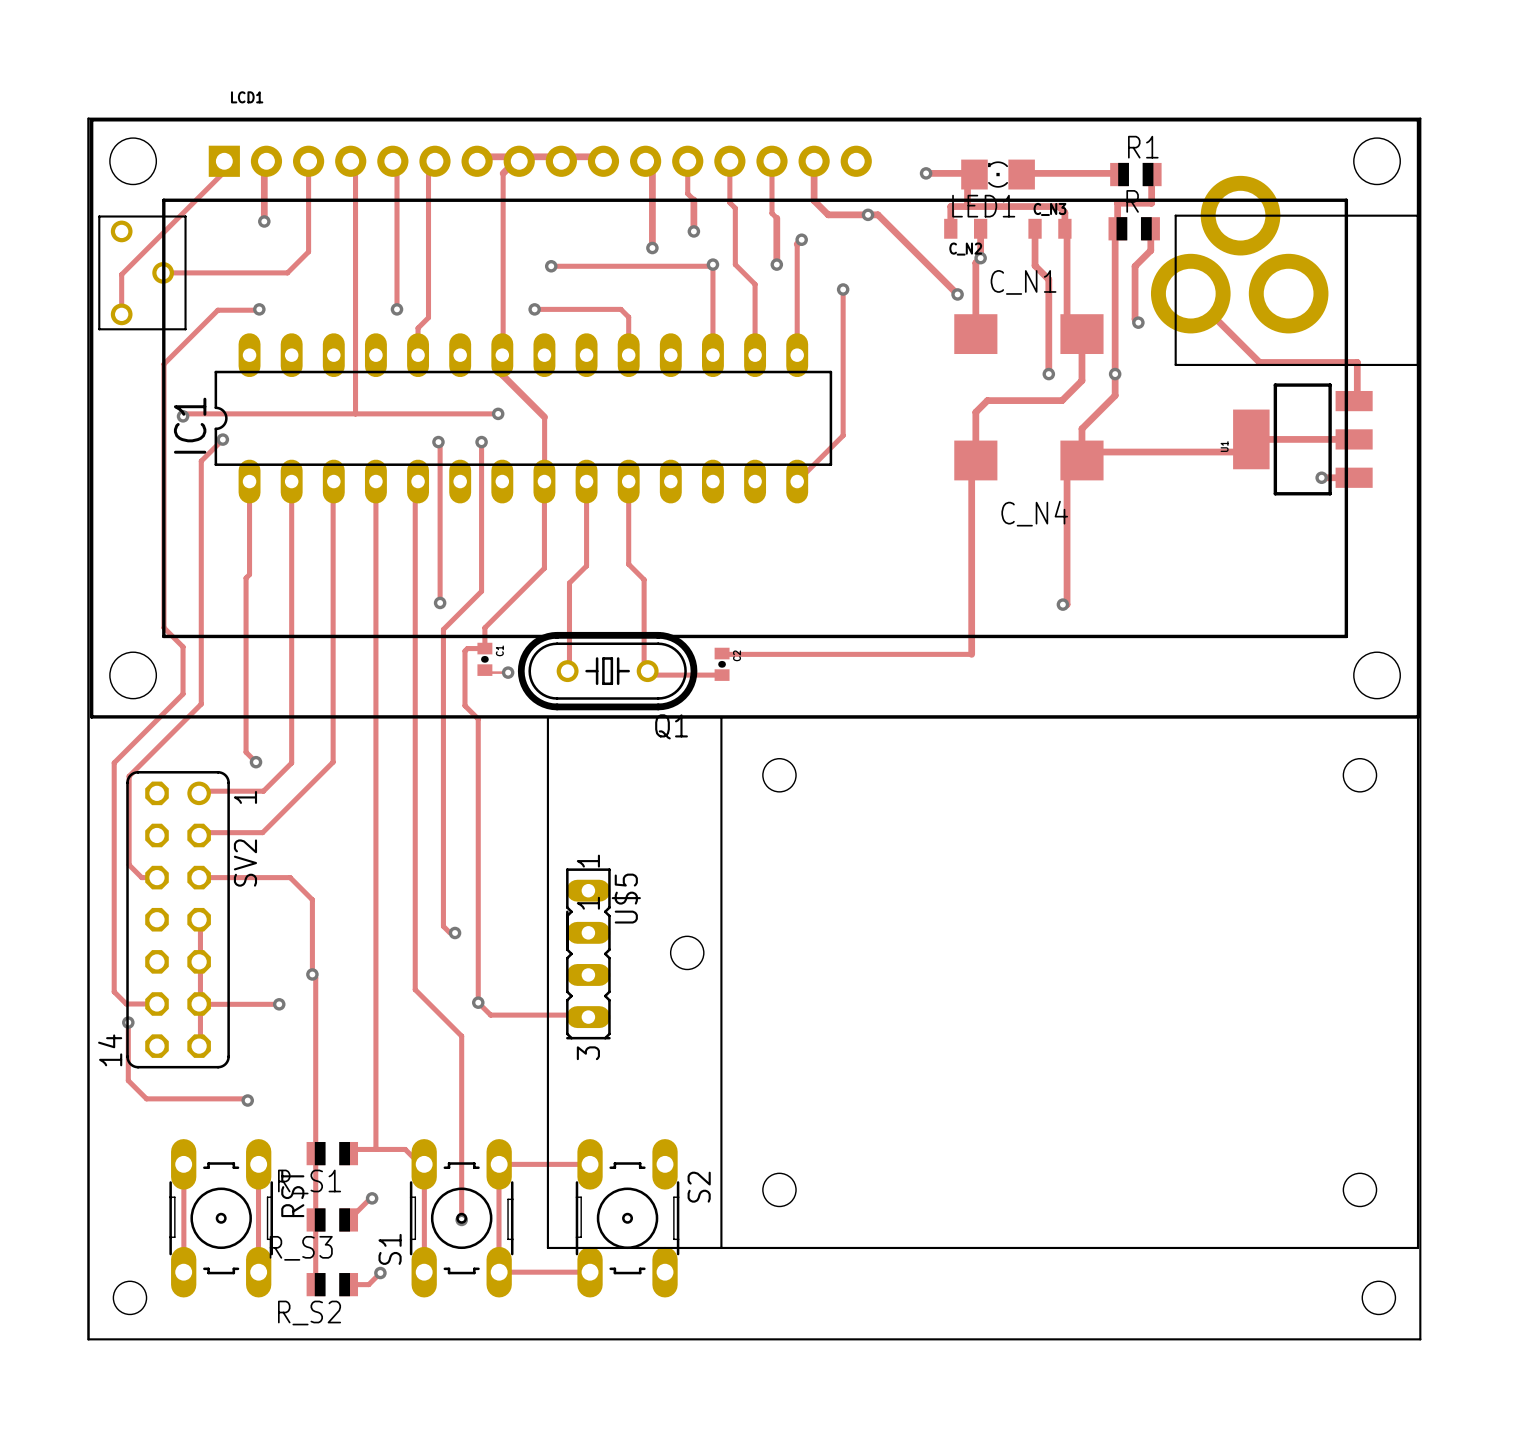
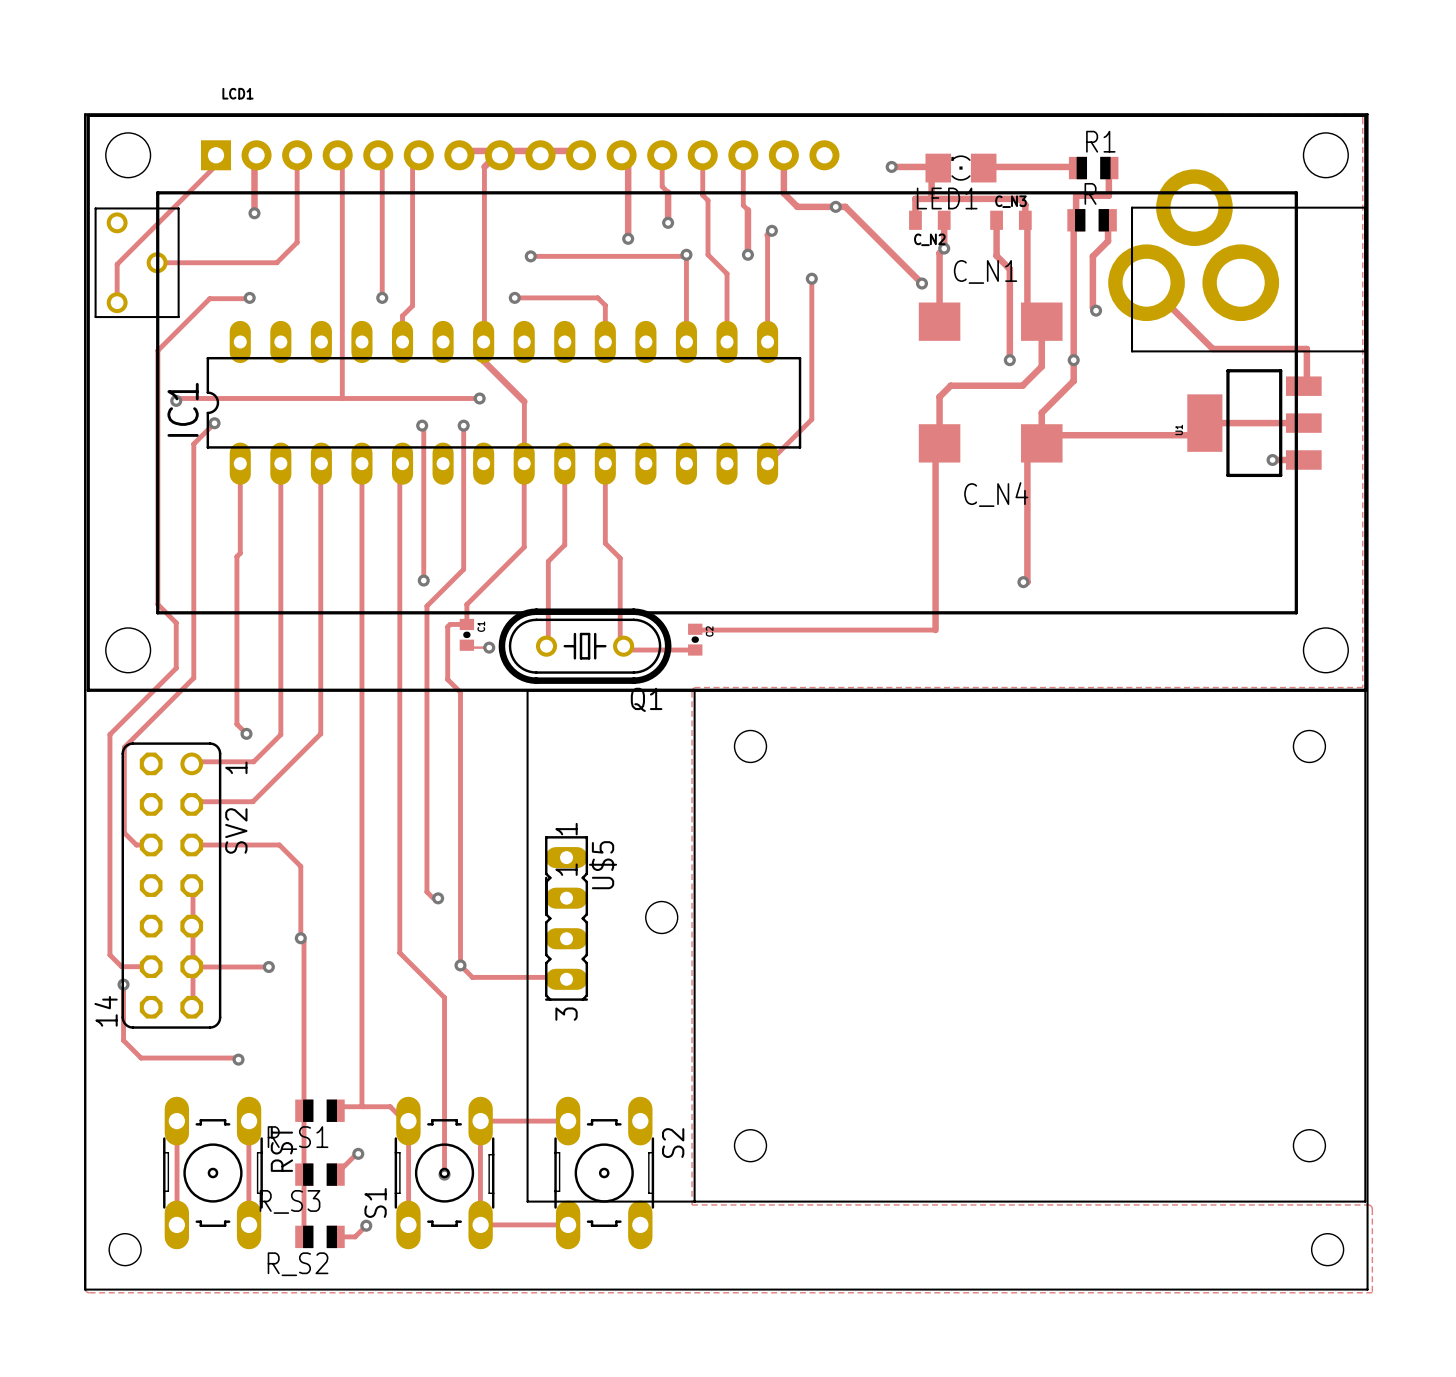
zone outline: none -> (1358, 114) (1362, 118) (1362, 687) (693, 688) (692, 691) (692, 1204) (1368, 1204) (1372, 1209) (1372, 1292) (86, 1291) (85, 115) (1358, 114)

